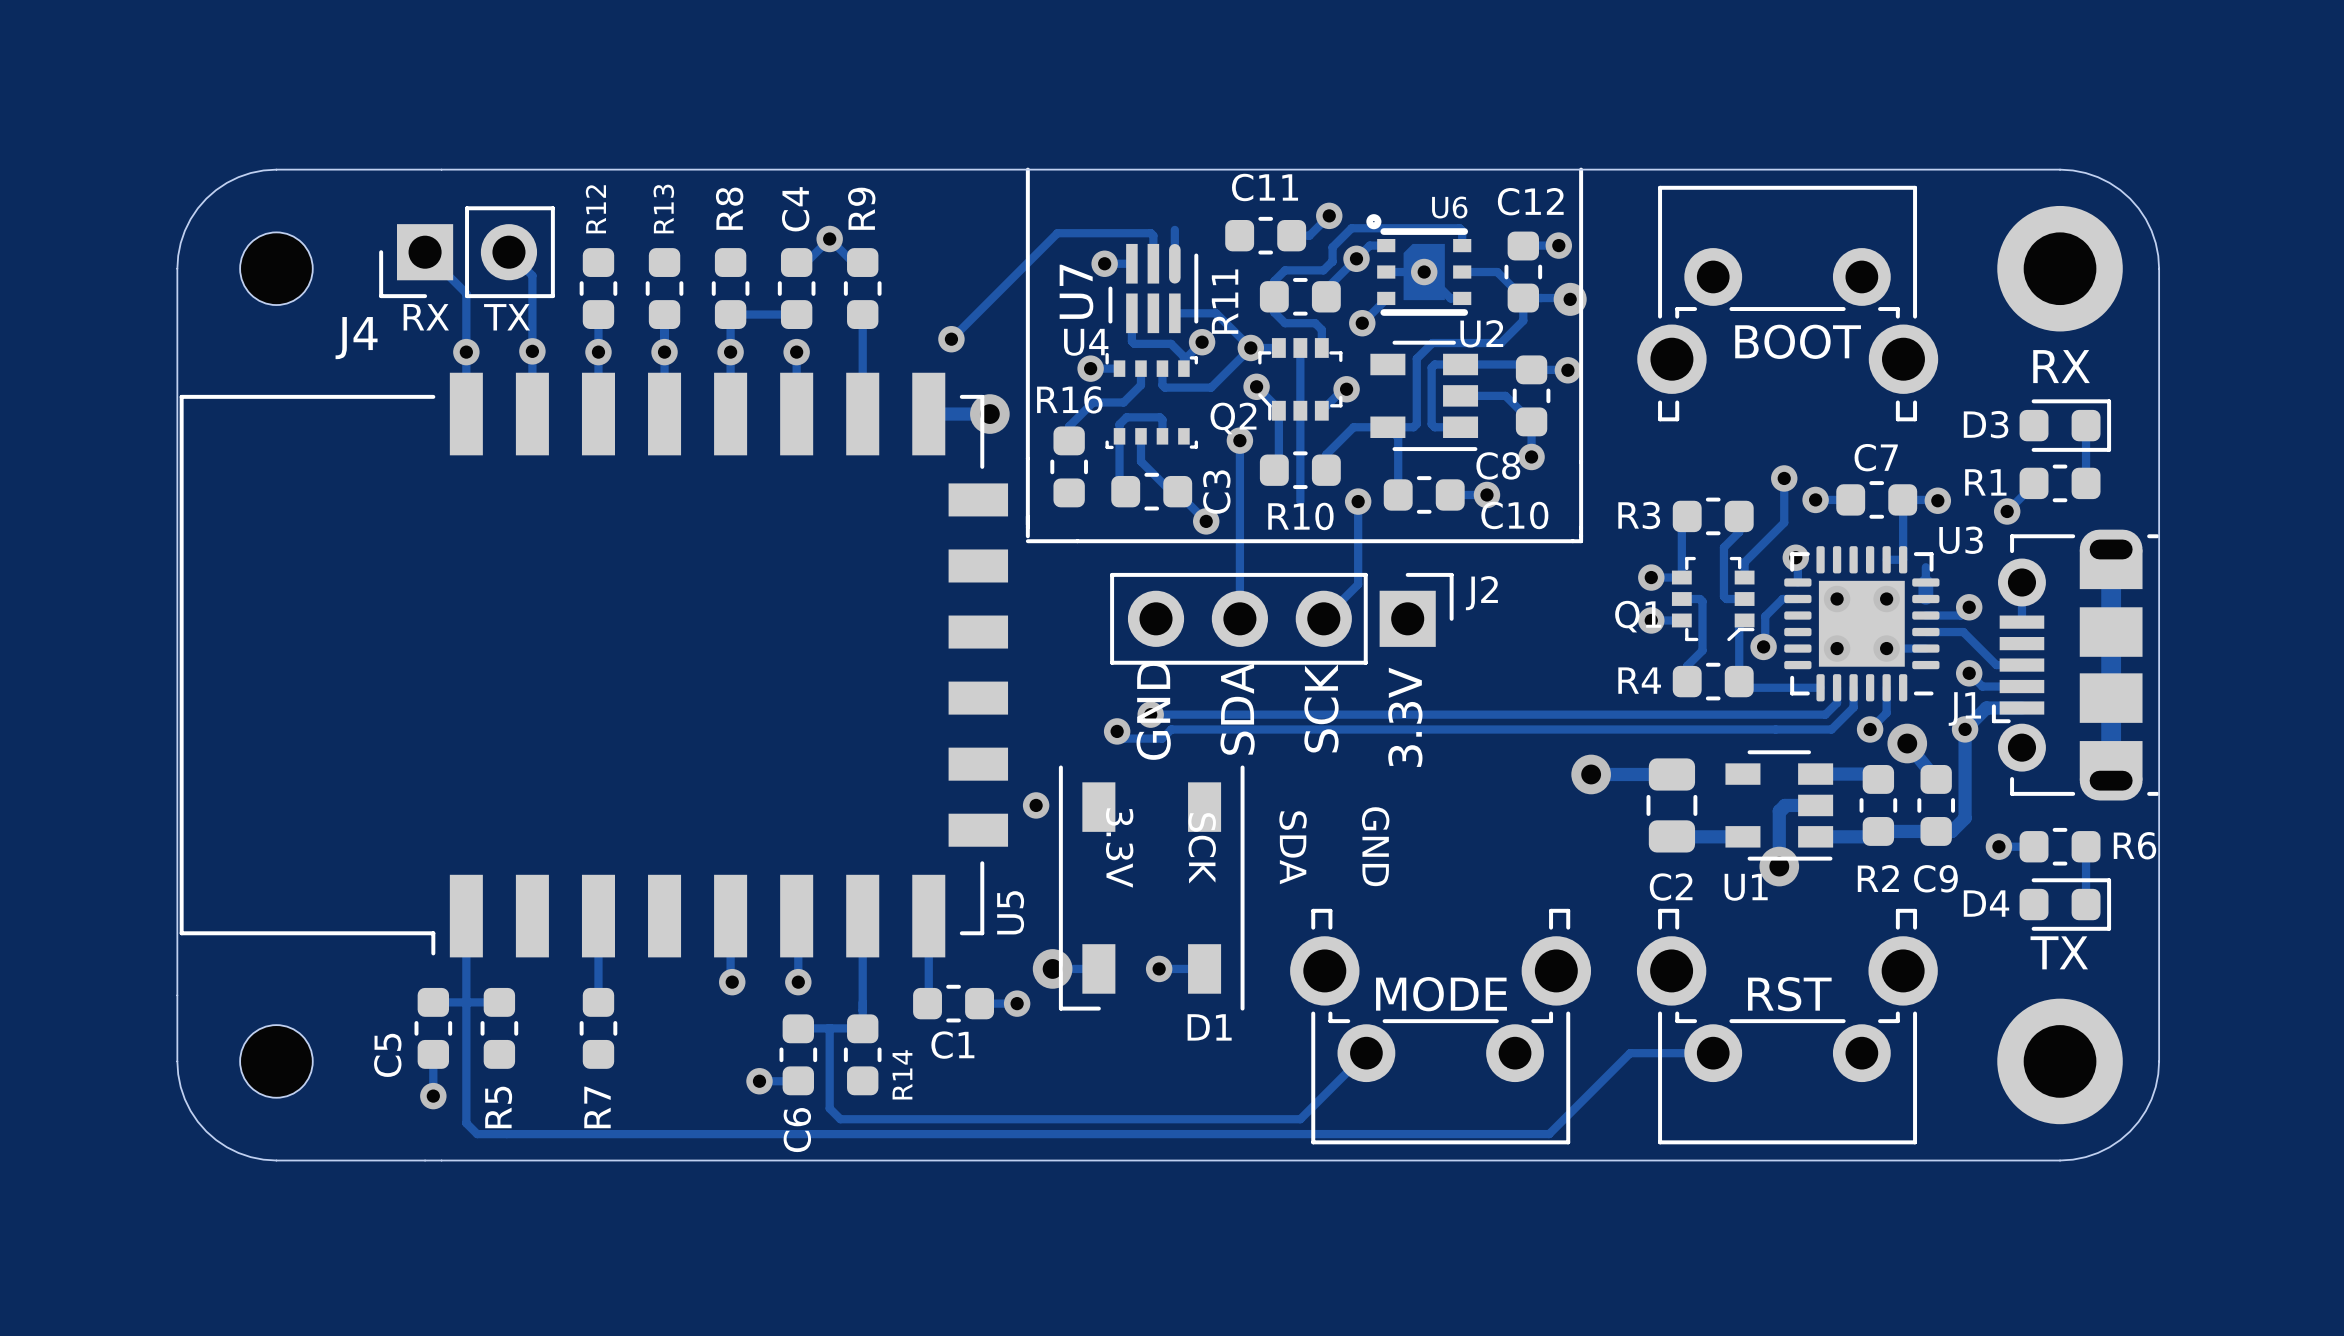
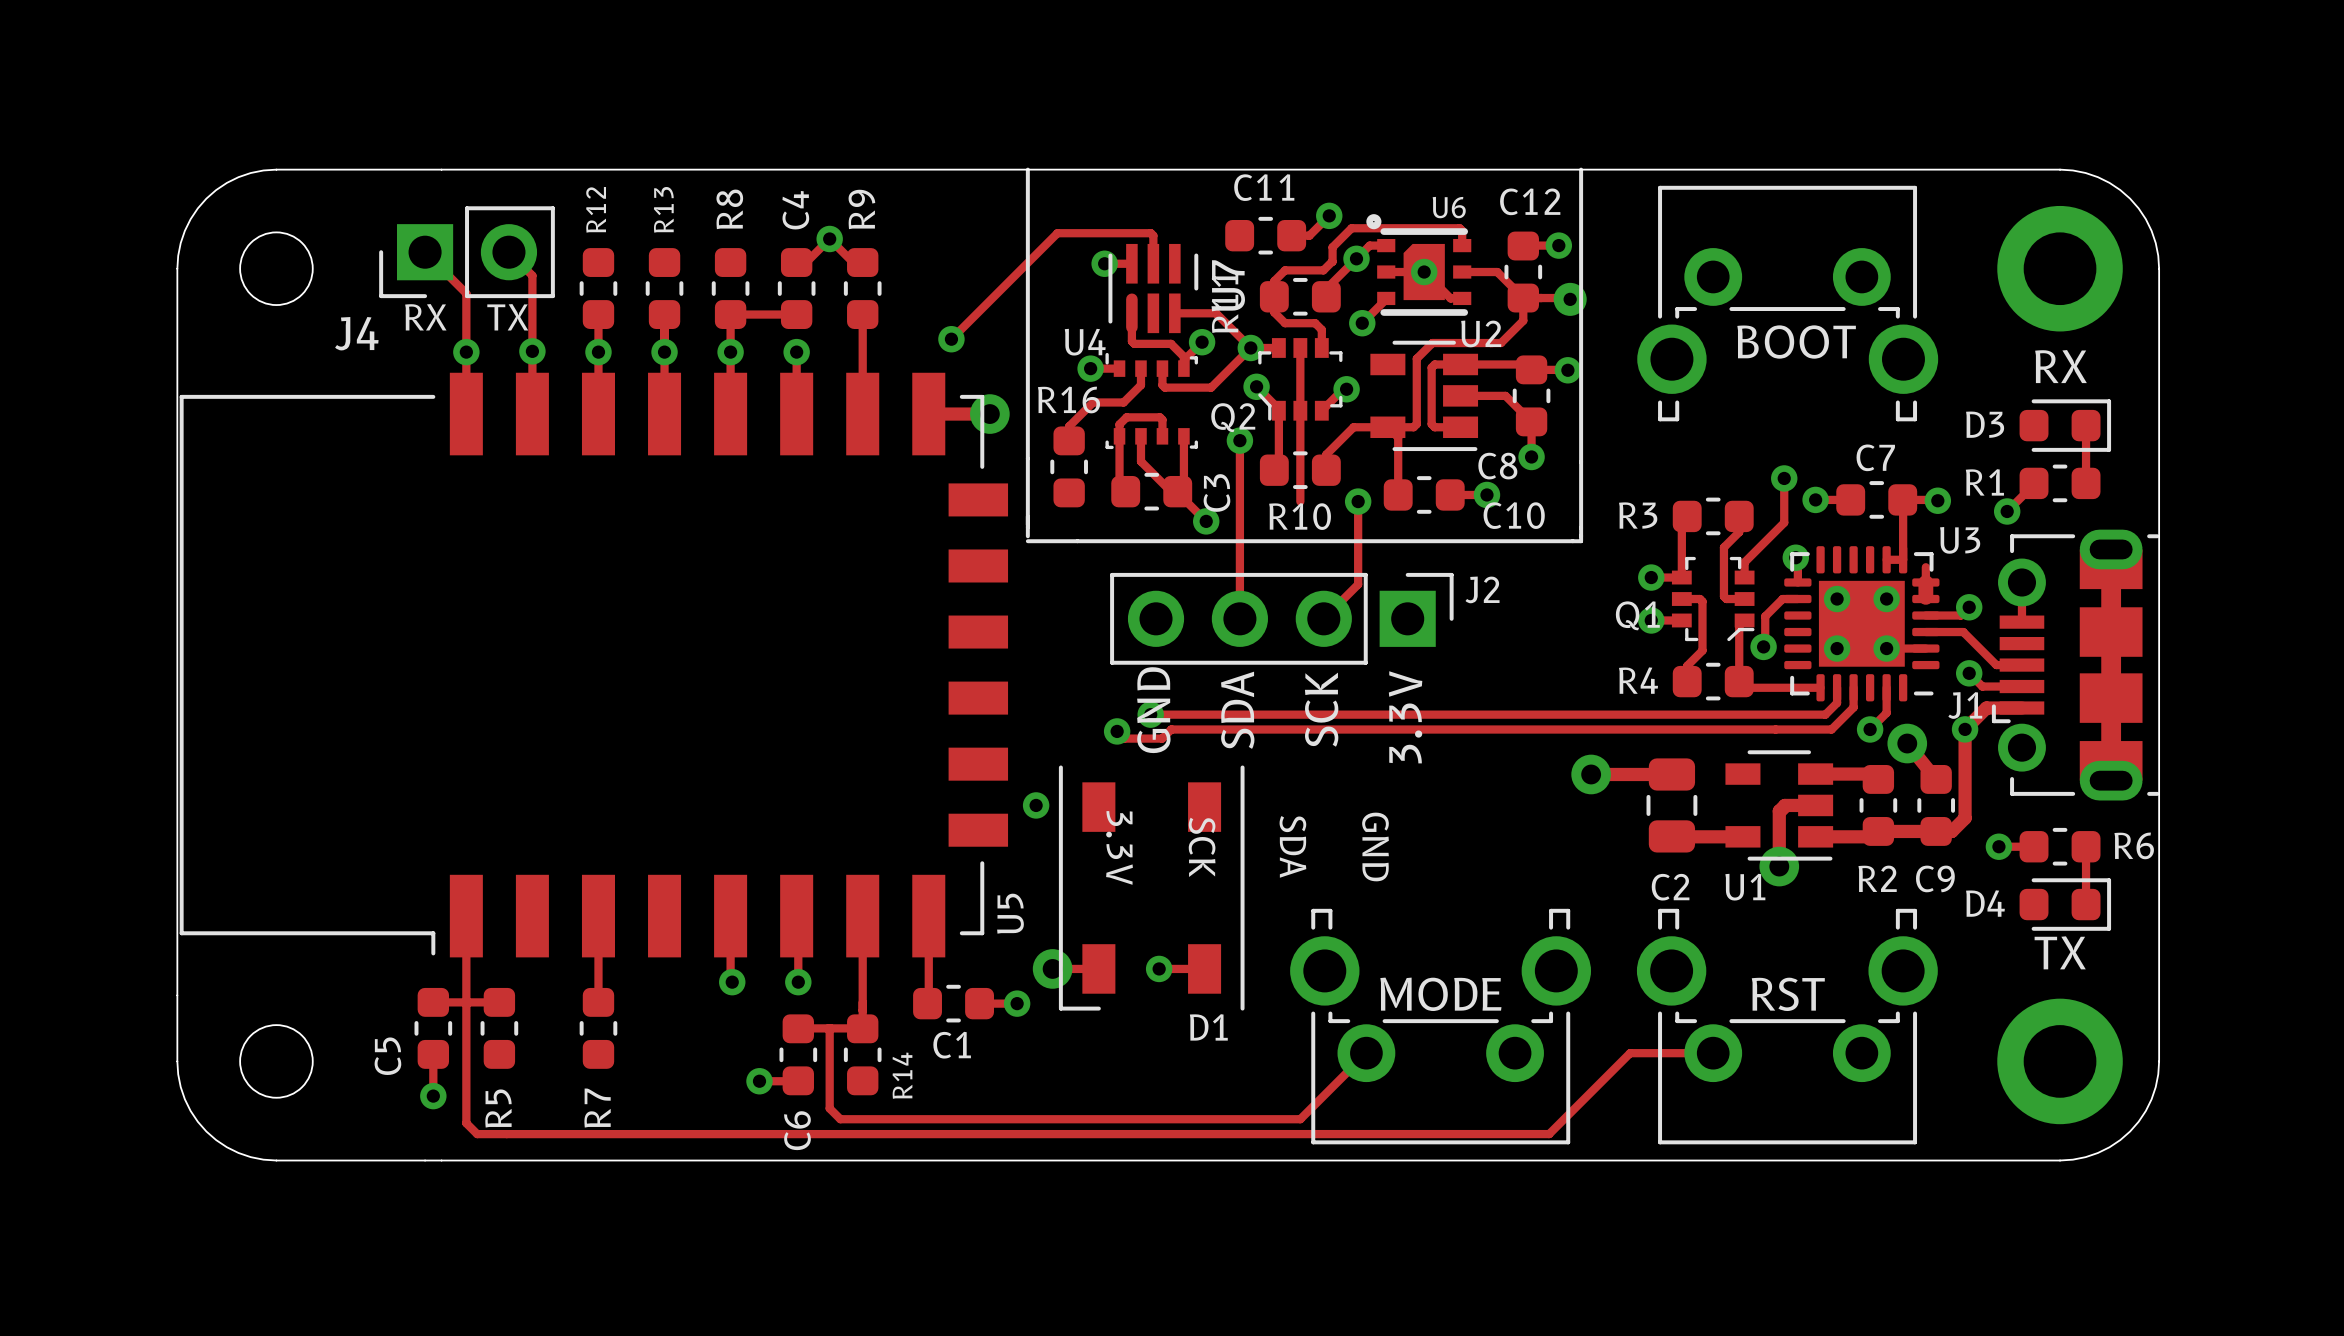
track: (1174, 229) (1174, 263) -> none
U7 rotation: 0° (1153, 288) -> 180° (1153, 288)
track: none -> (1183, 436) (1183, 485) (1177, 491)

